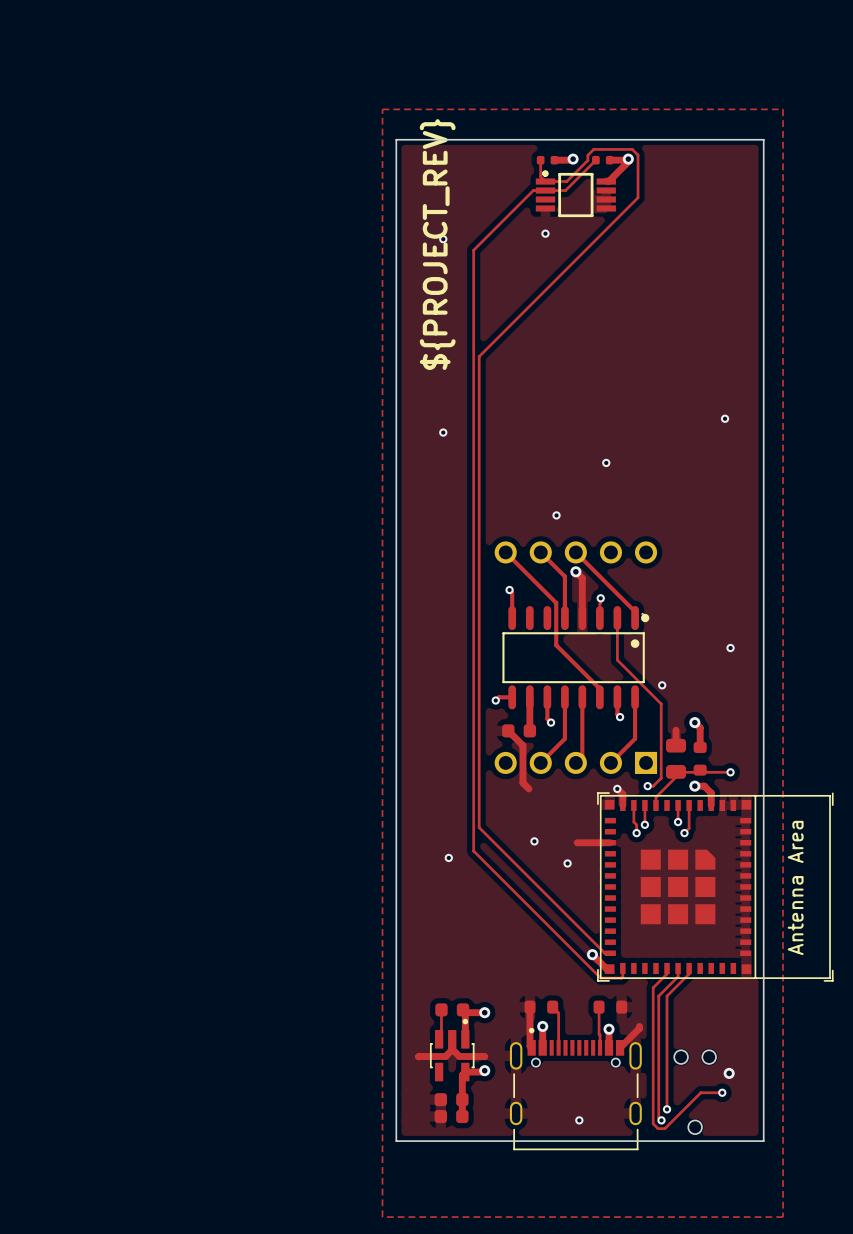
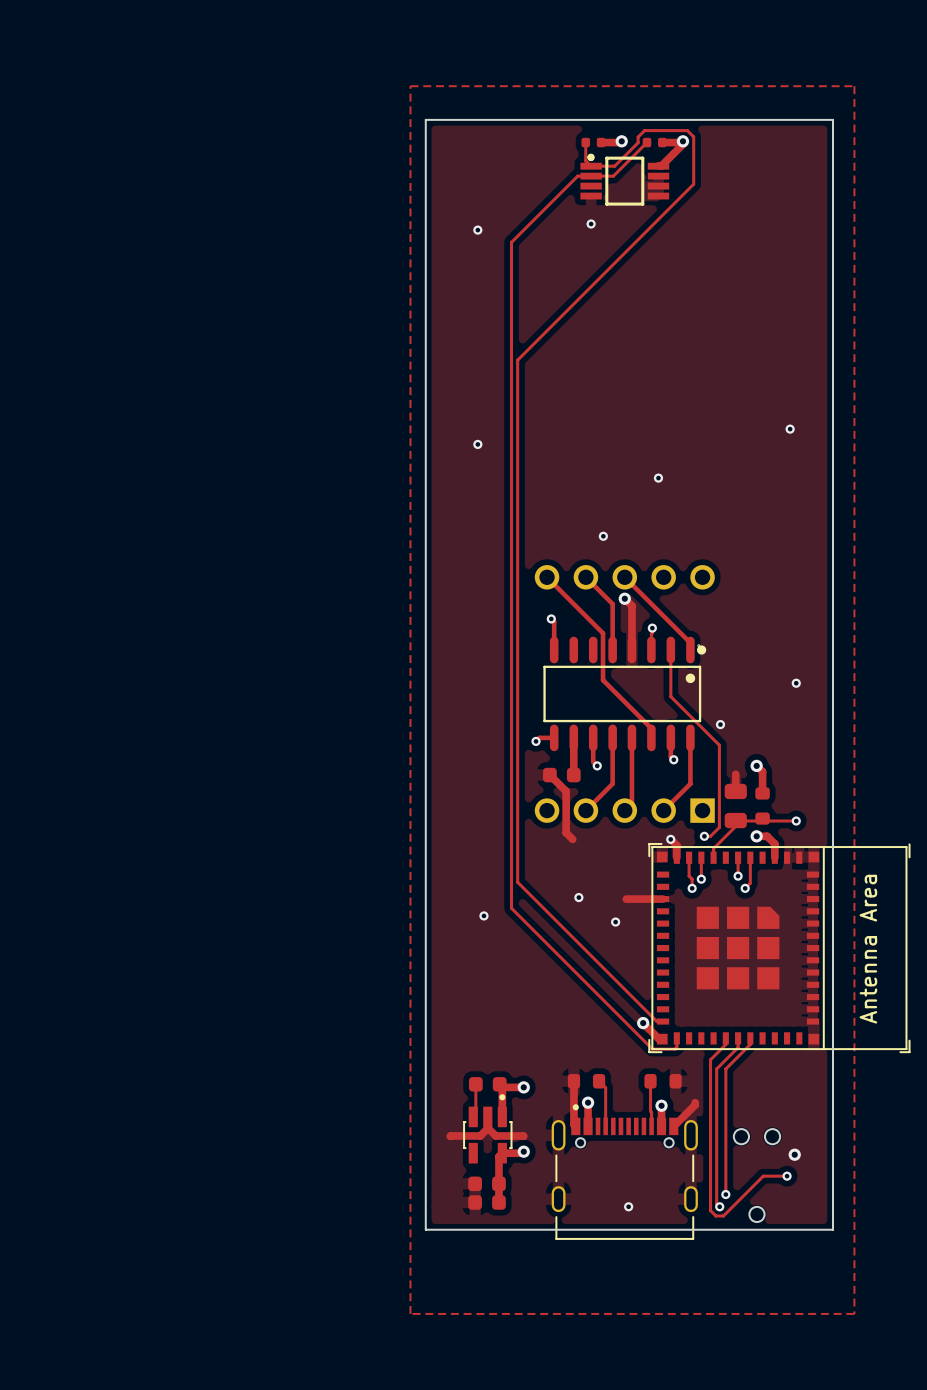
text: ${PROJECT_REV} (437, 244) -> none

